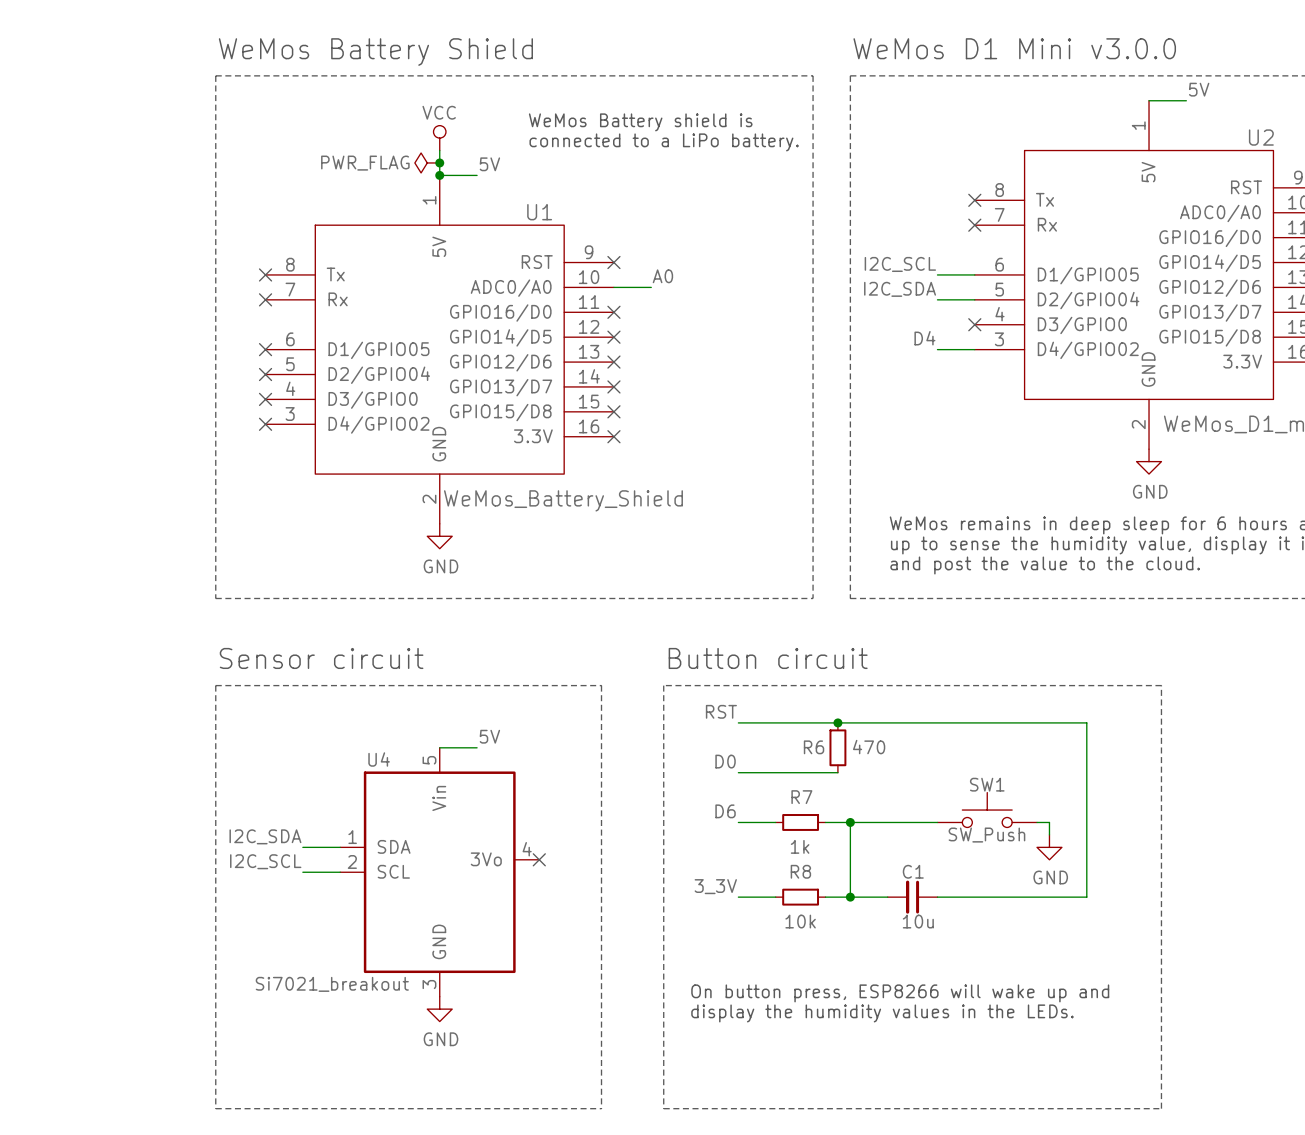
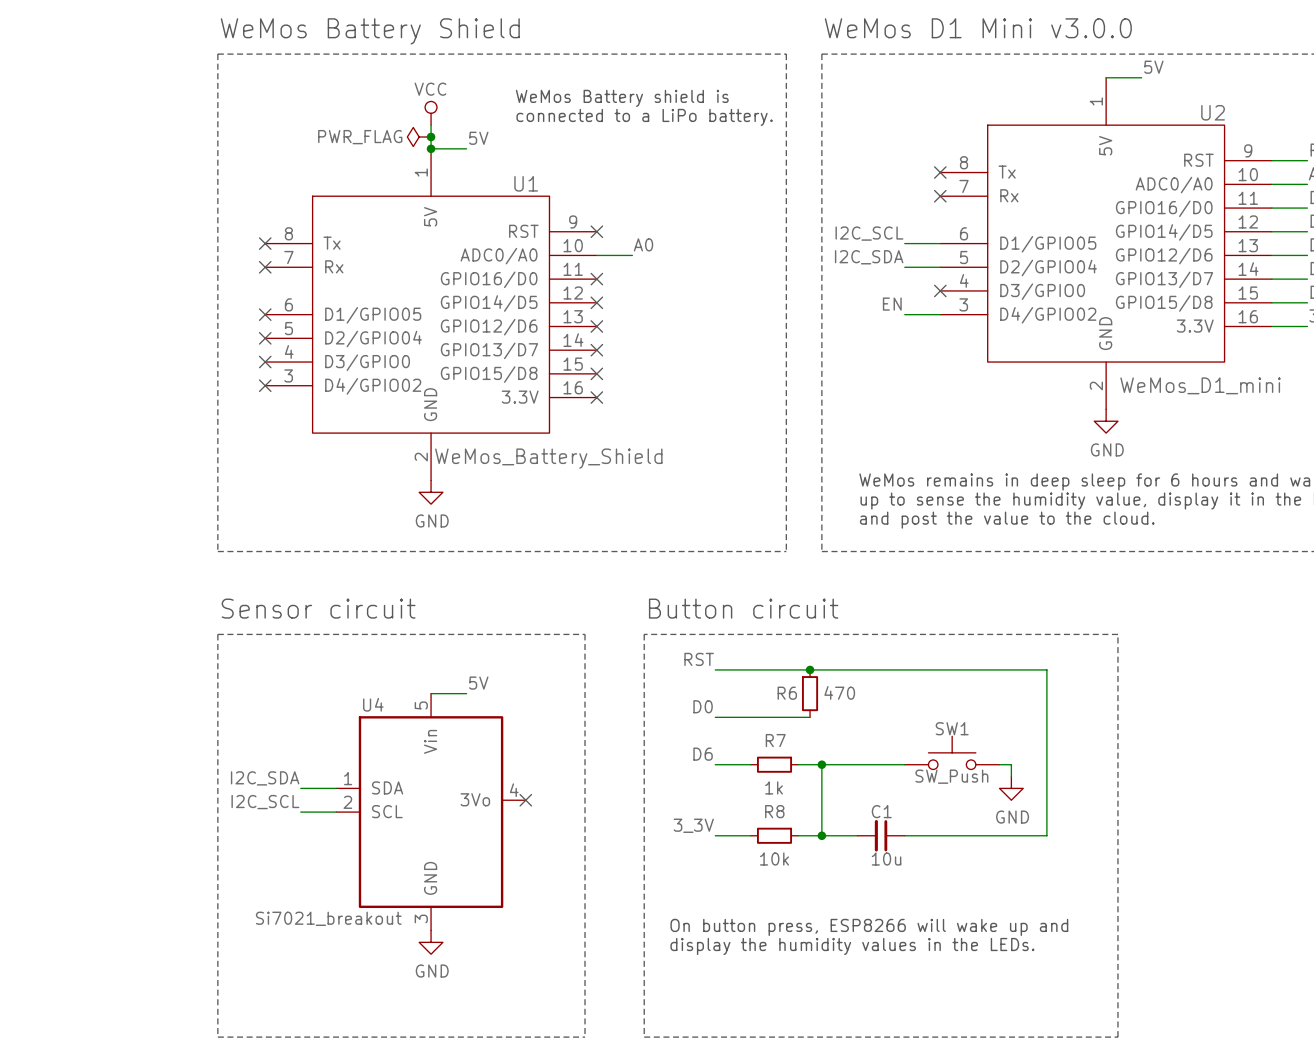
label: D4 (924, 338) -> EN (892, 304)

